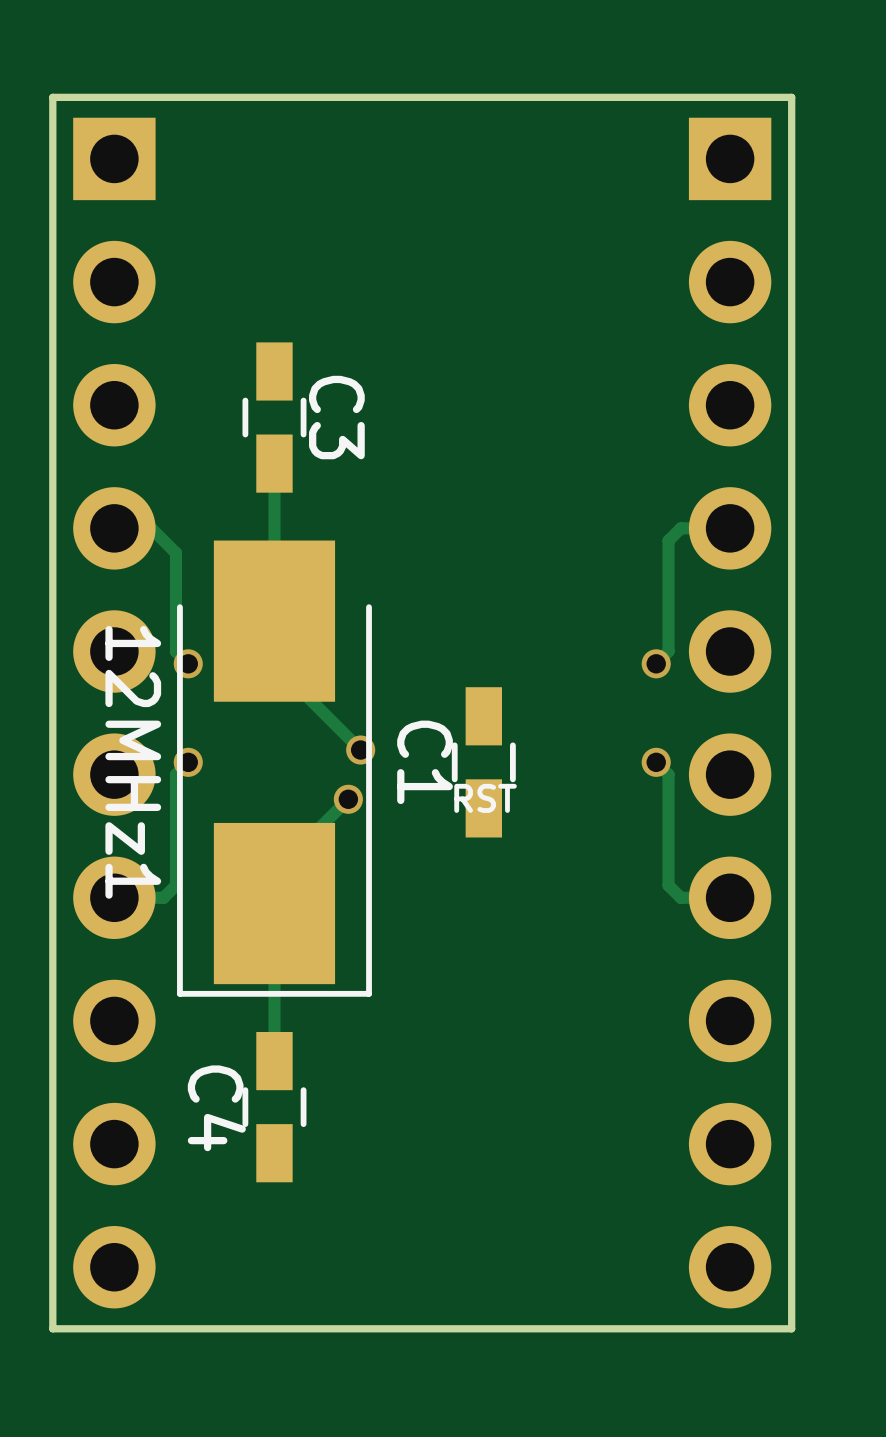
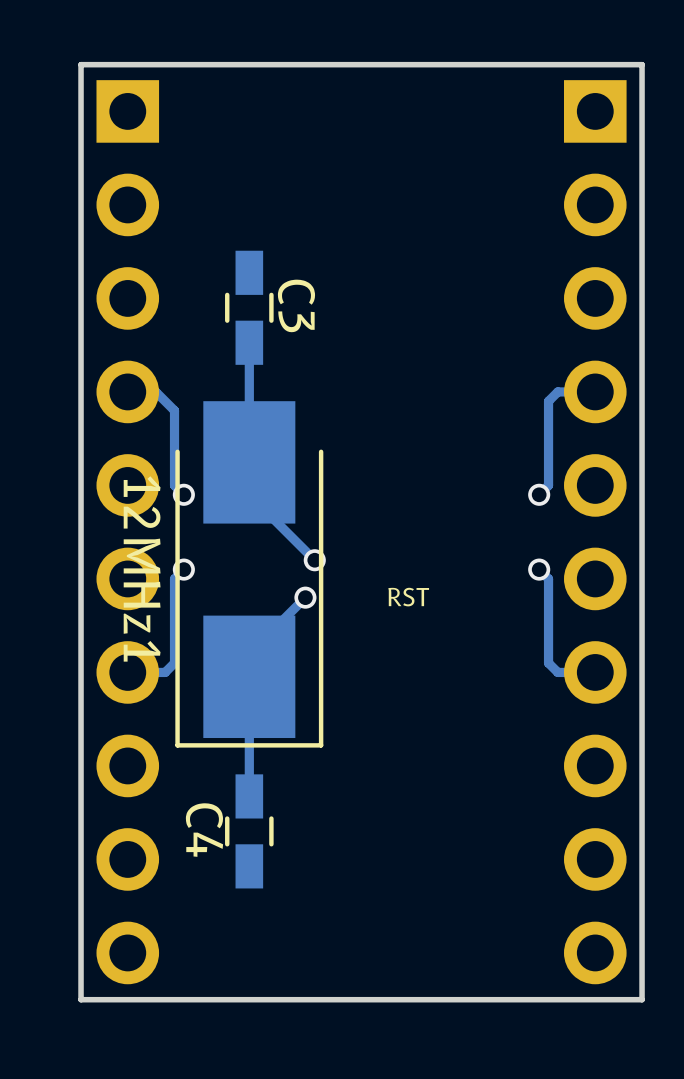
C1: (483, 762) -> none

